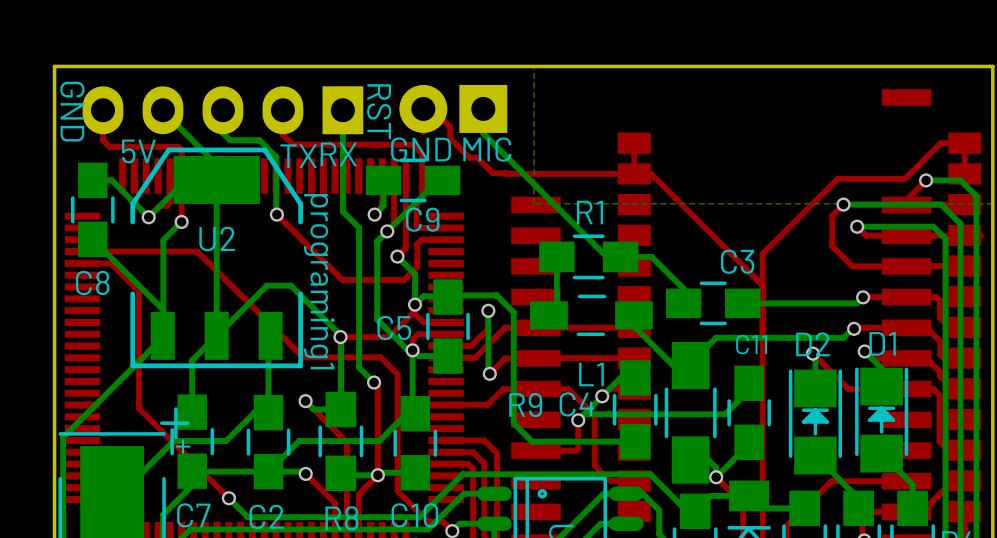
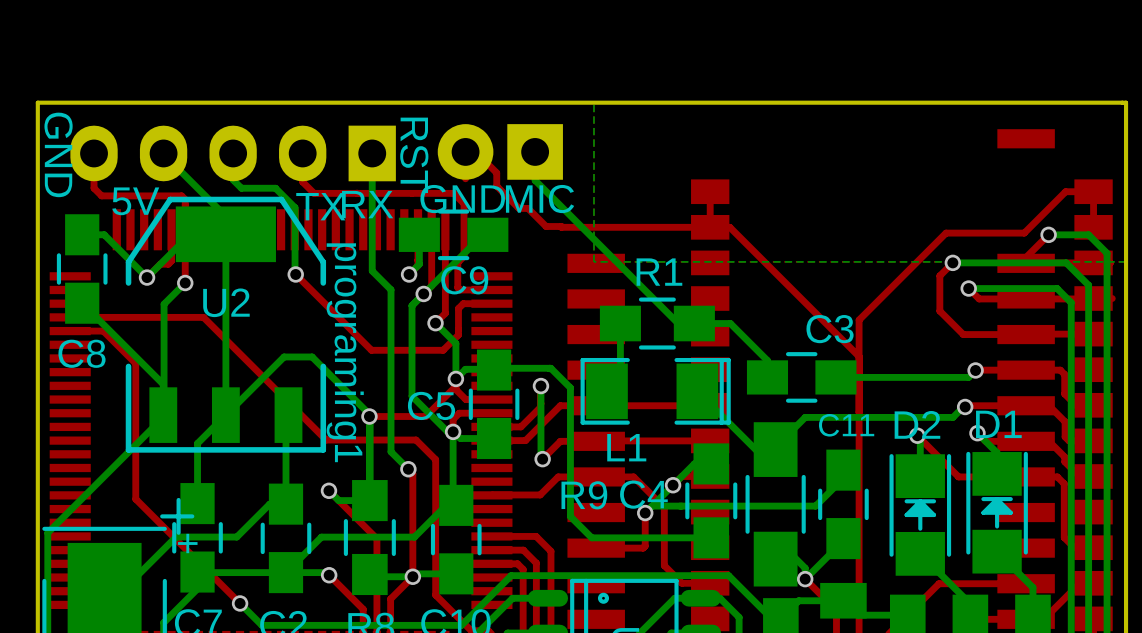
L1 footprint: [530, 294, 653, 337] -> [580, 357, 731, 425]

